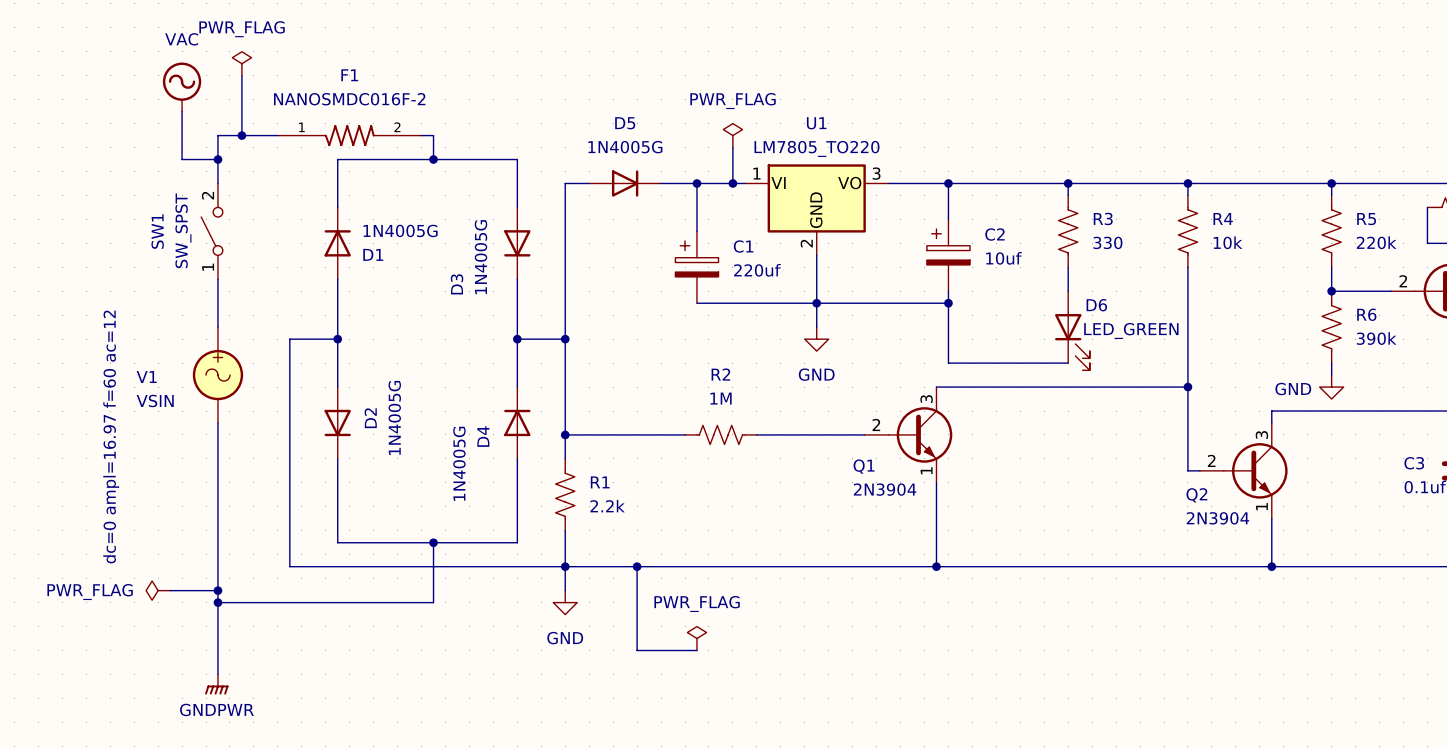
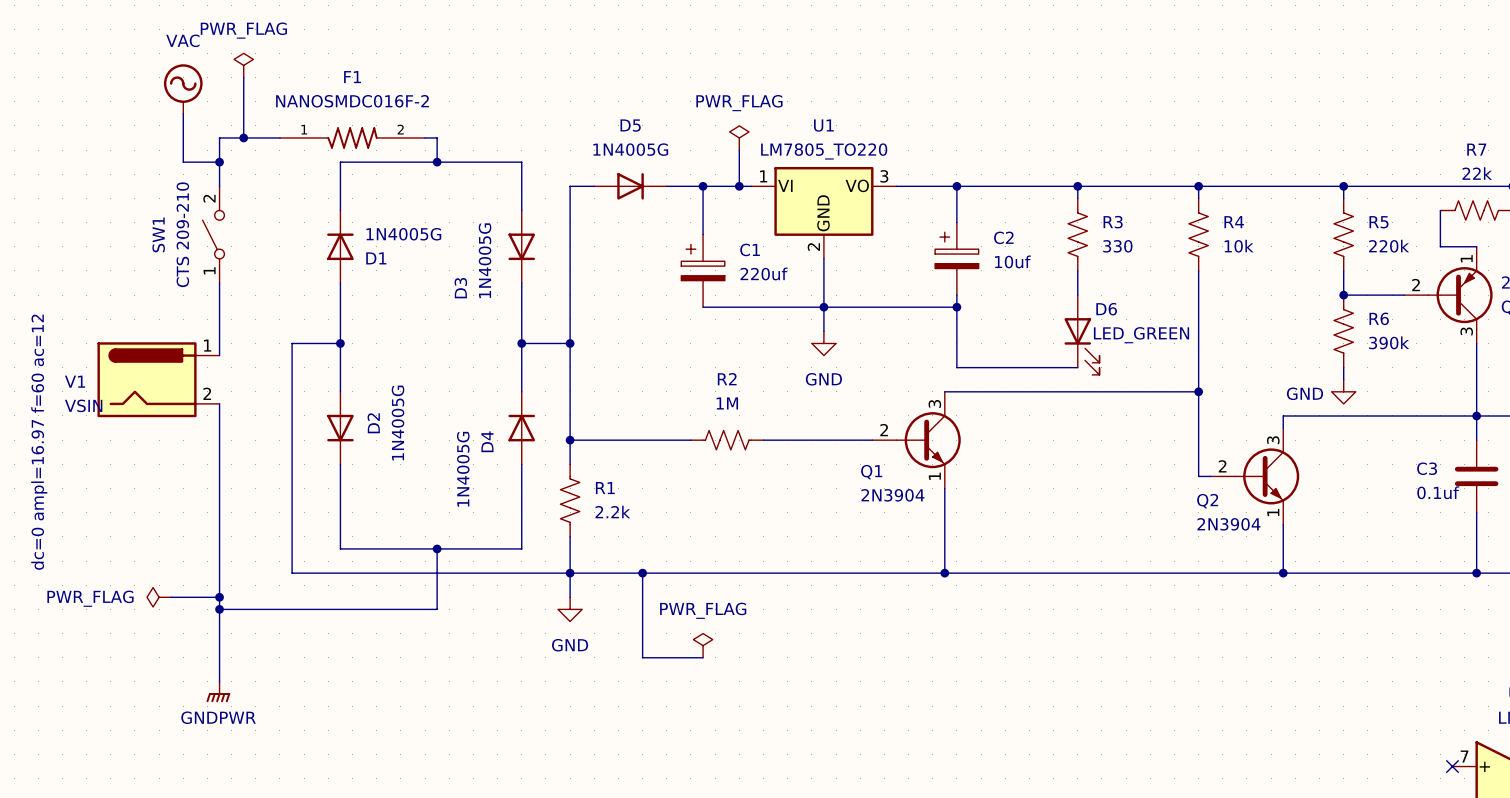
SW1 value: SW_SPST (183, 230) -> CTS 209-210 (182, 234)
V1 symbol: [192, 327, 244, 423] -> [97, 342, 220, 418]

